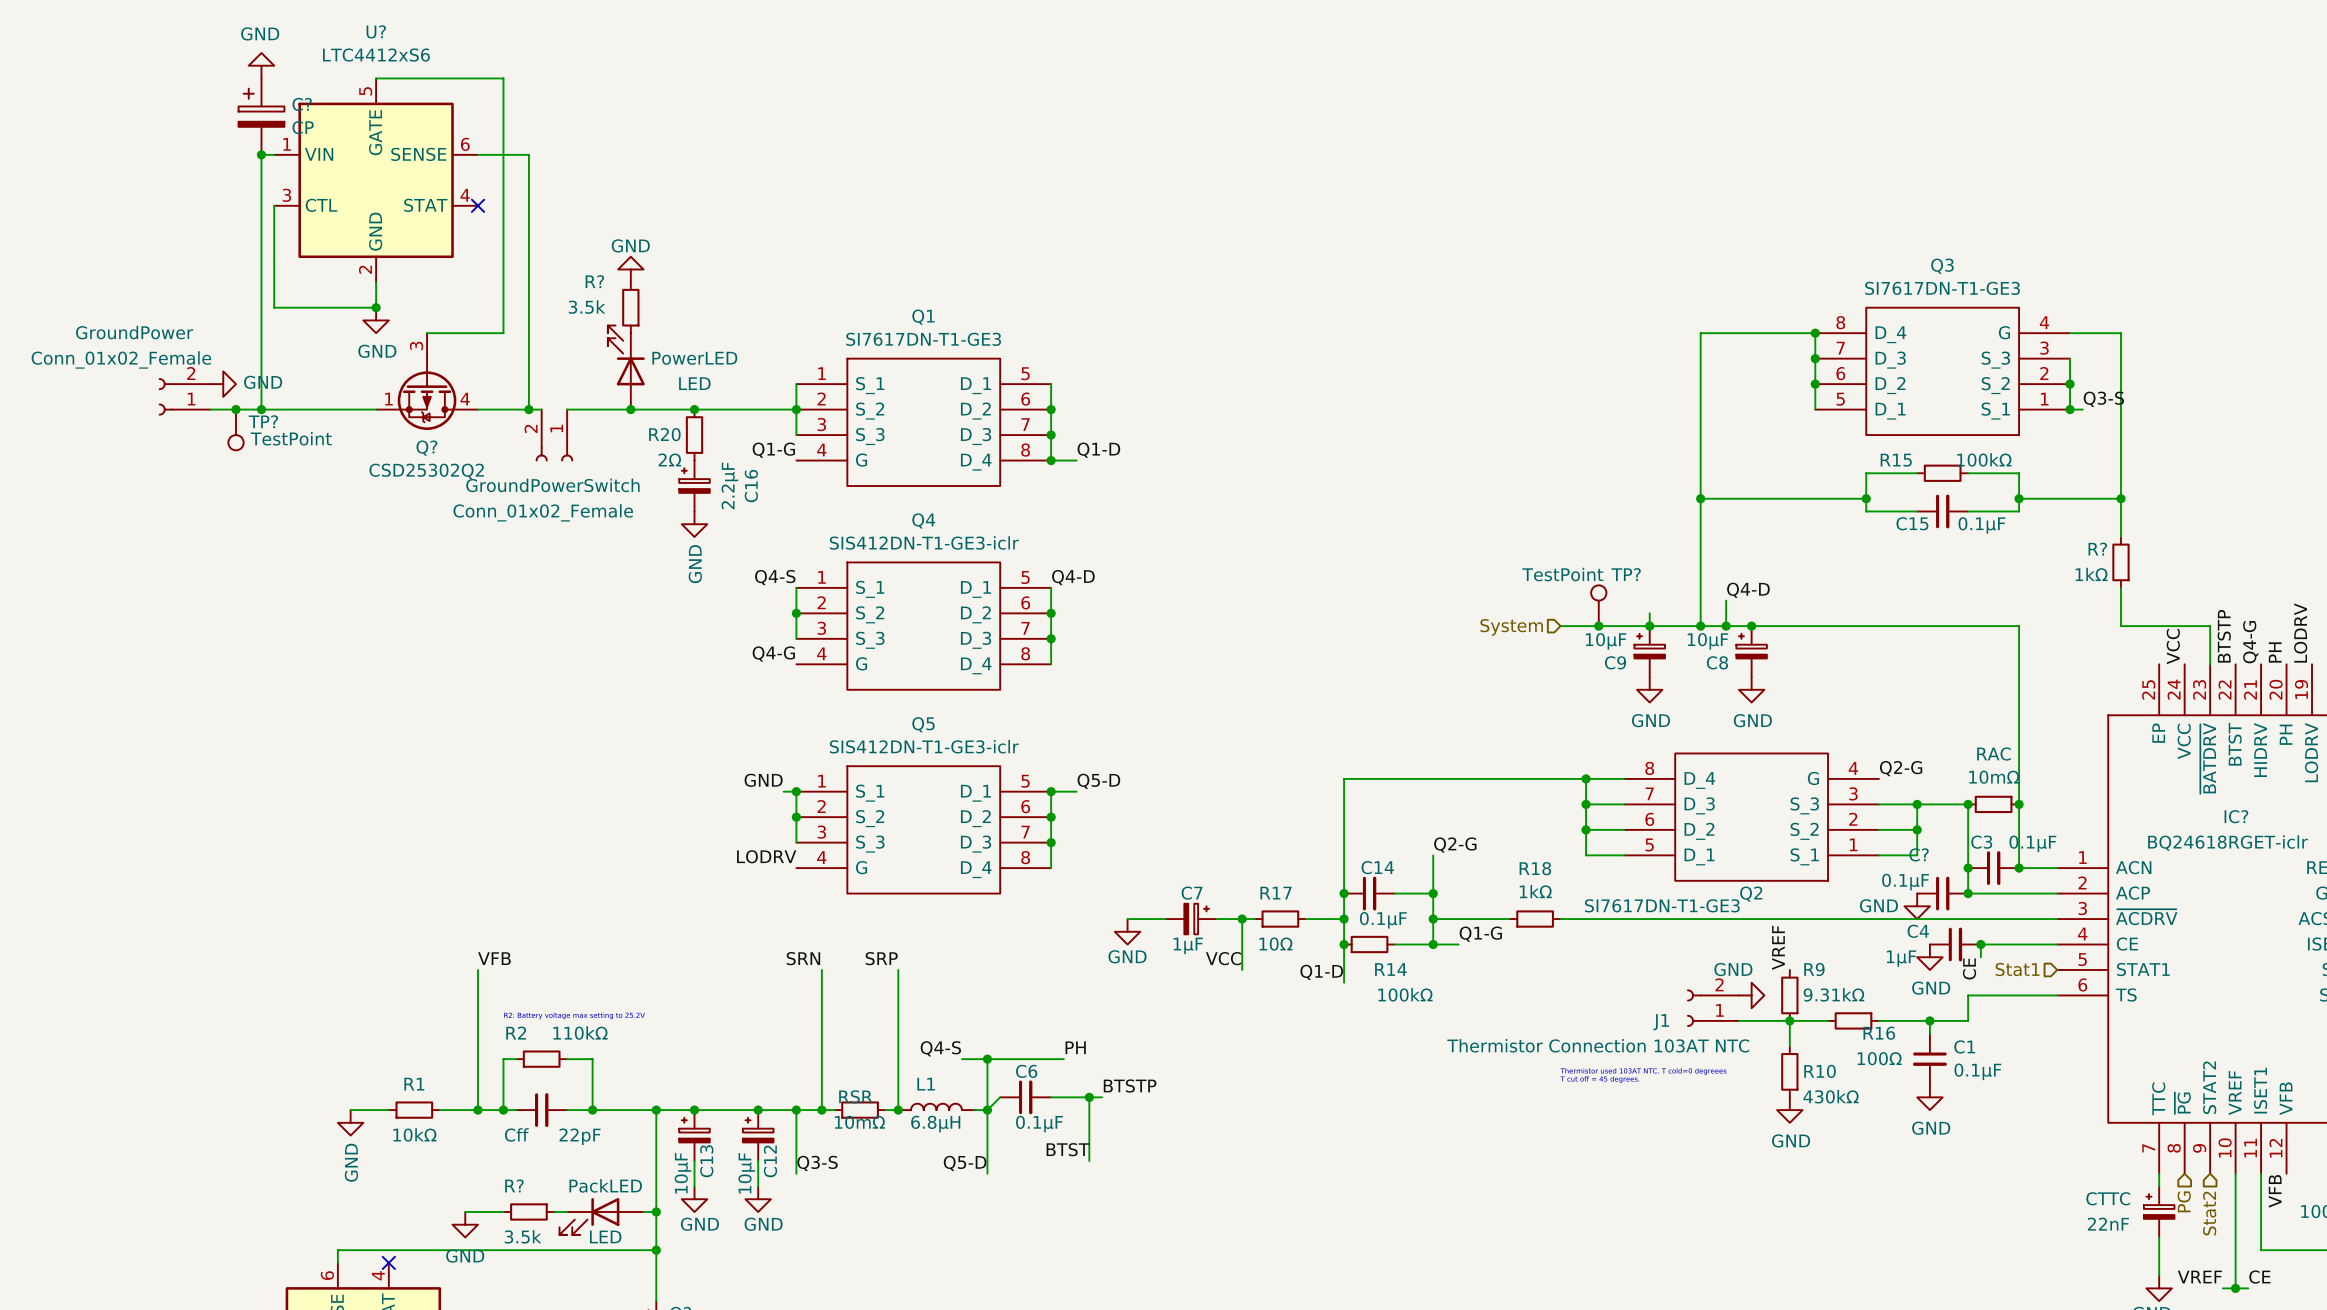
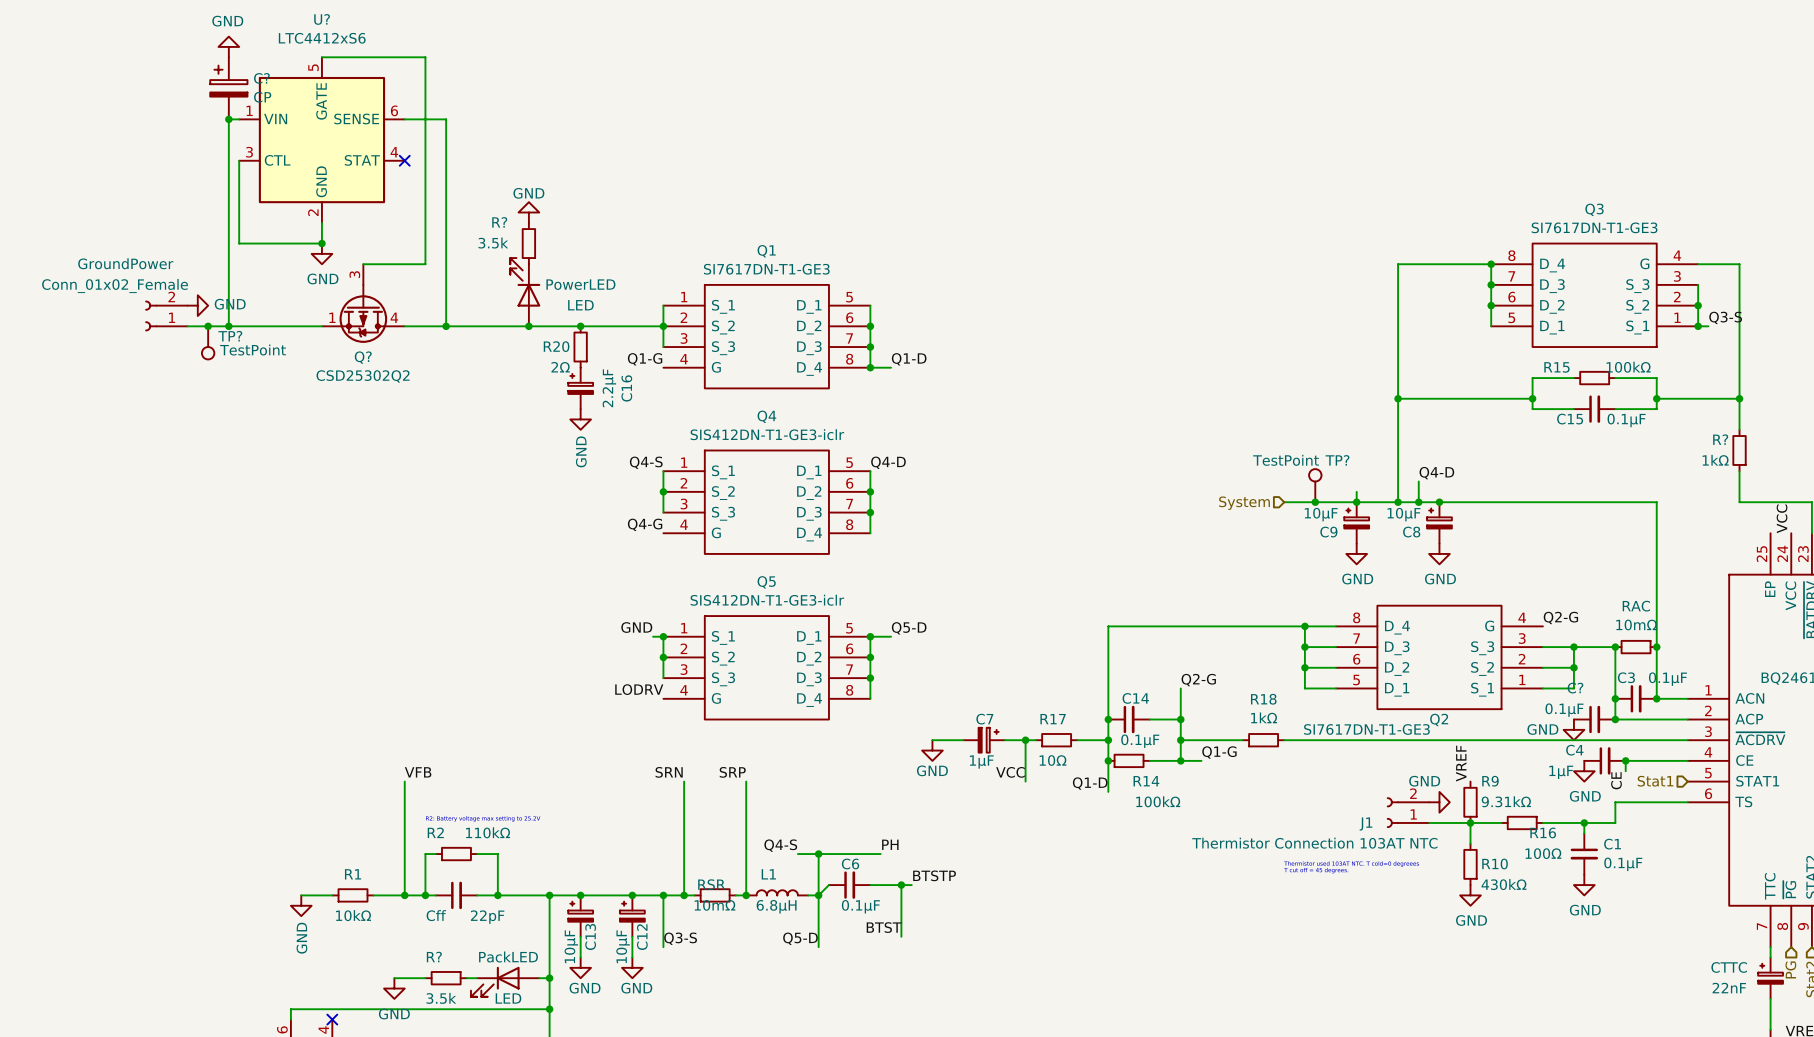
wire: none -> (456, 326) (477, 326)
GroundPowerSwitch: Conn_01x02_Female (554, 435) -> none

